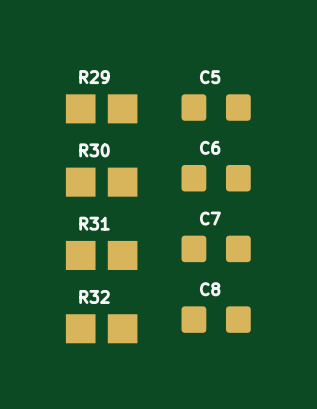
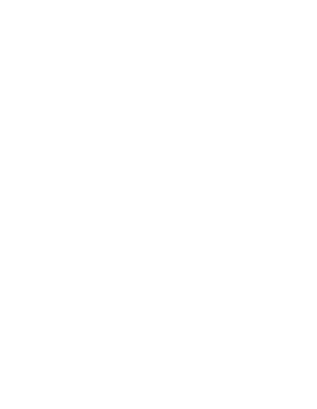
C5: (216, 107) -> none
R29: (101, 108) -> none
C6: (216, 178) -> none
R30: (101, 182) -> none
C7: (216, 248) -> none
R31: (101, 255) -> none
C8: (216, 319) -> none
R32: (101, 328) -> none

